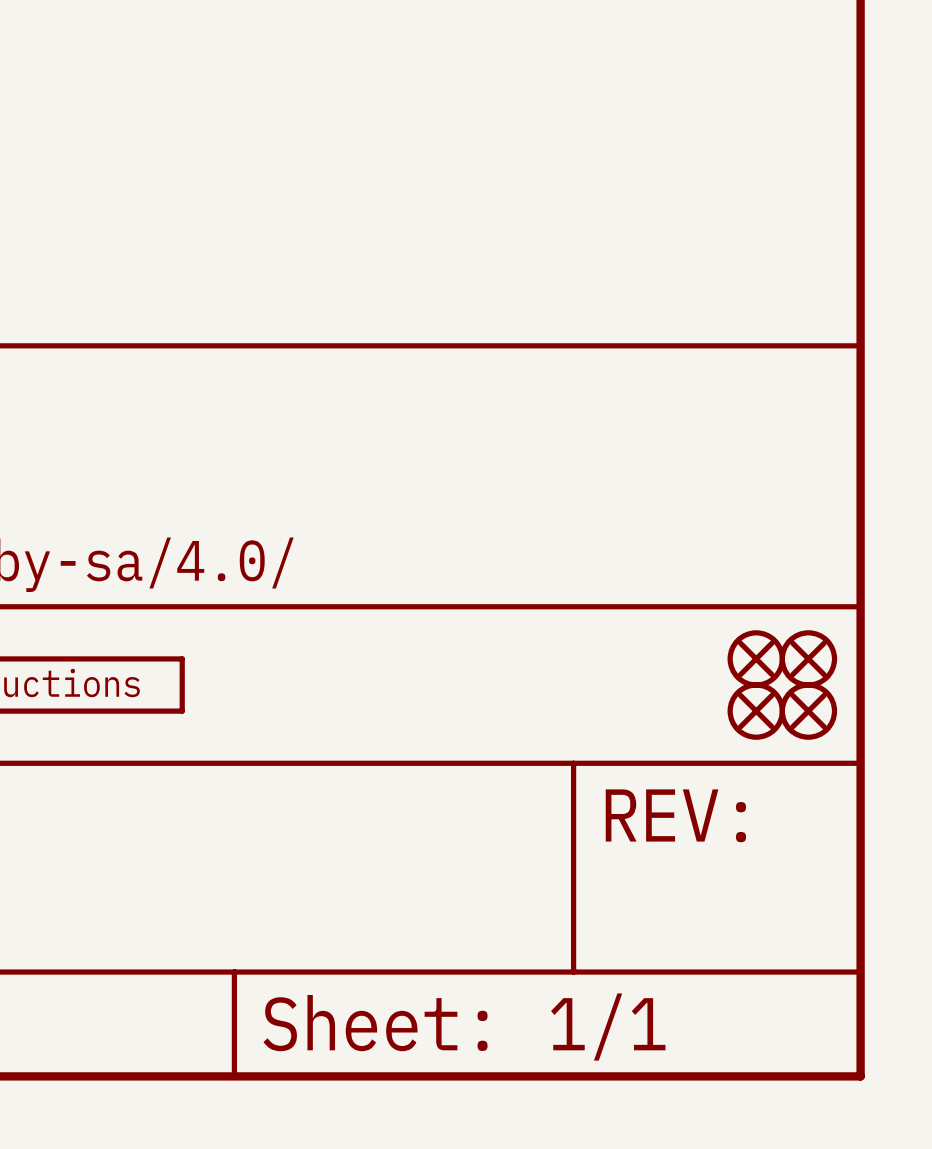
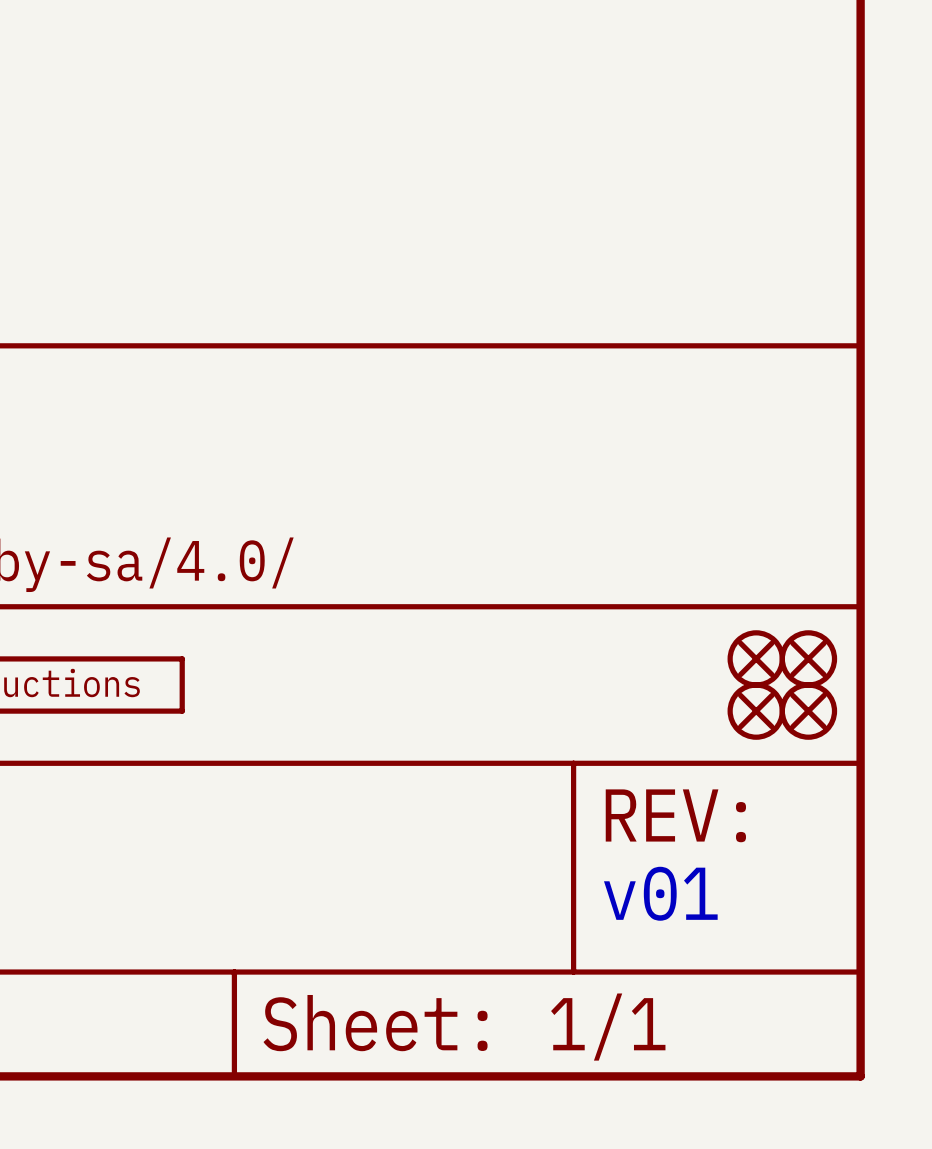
text: none -> v01 (660, 893)

